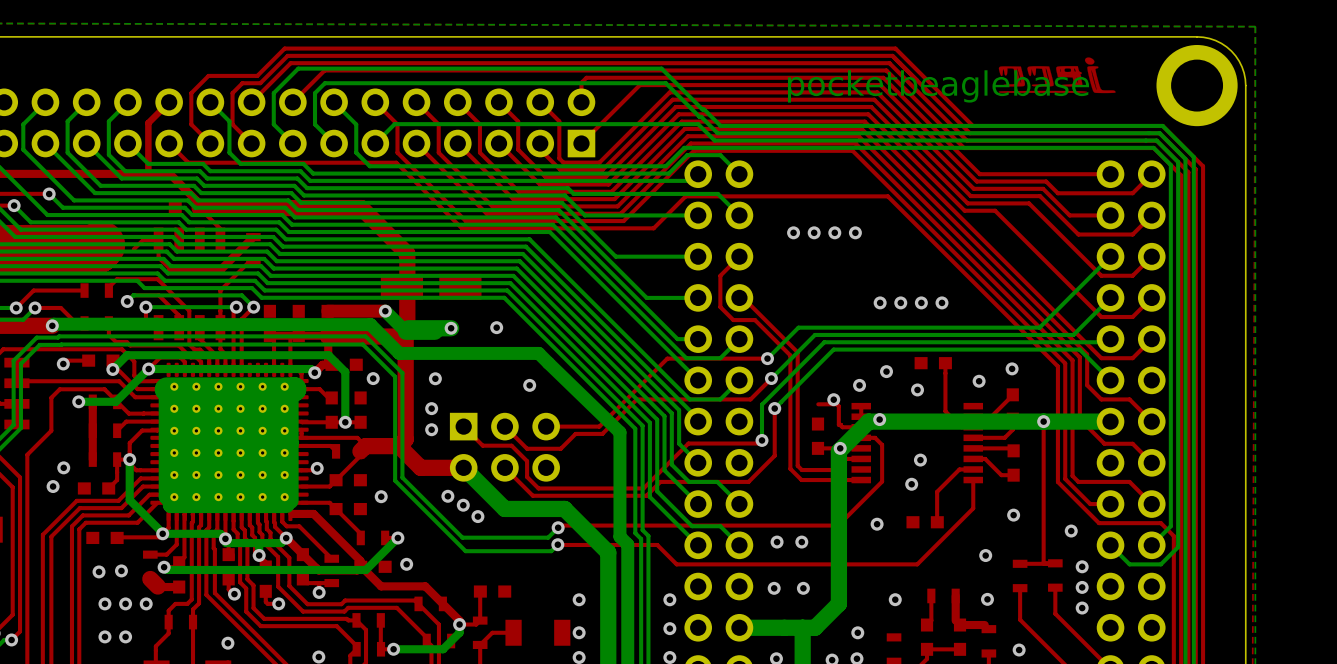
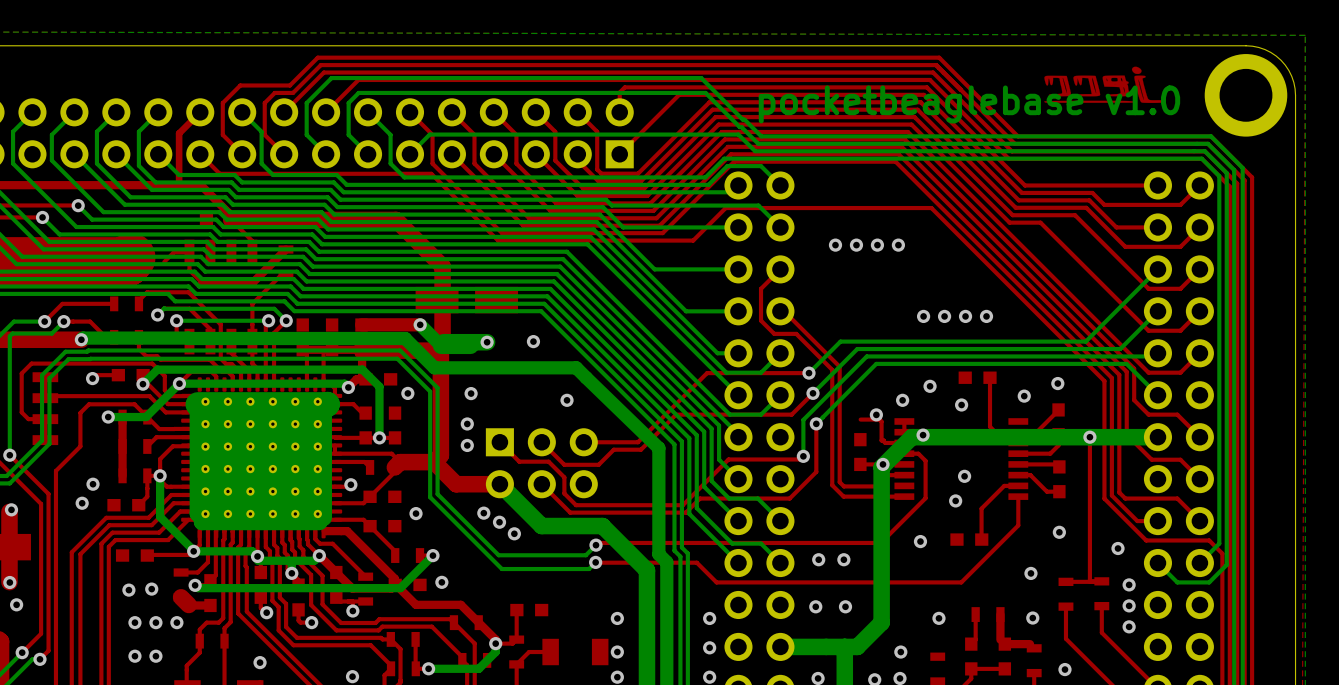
text: pocketbeaglebase (938, 86) -> pocketbeaglebase v1.0 (969, 104)

